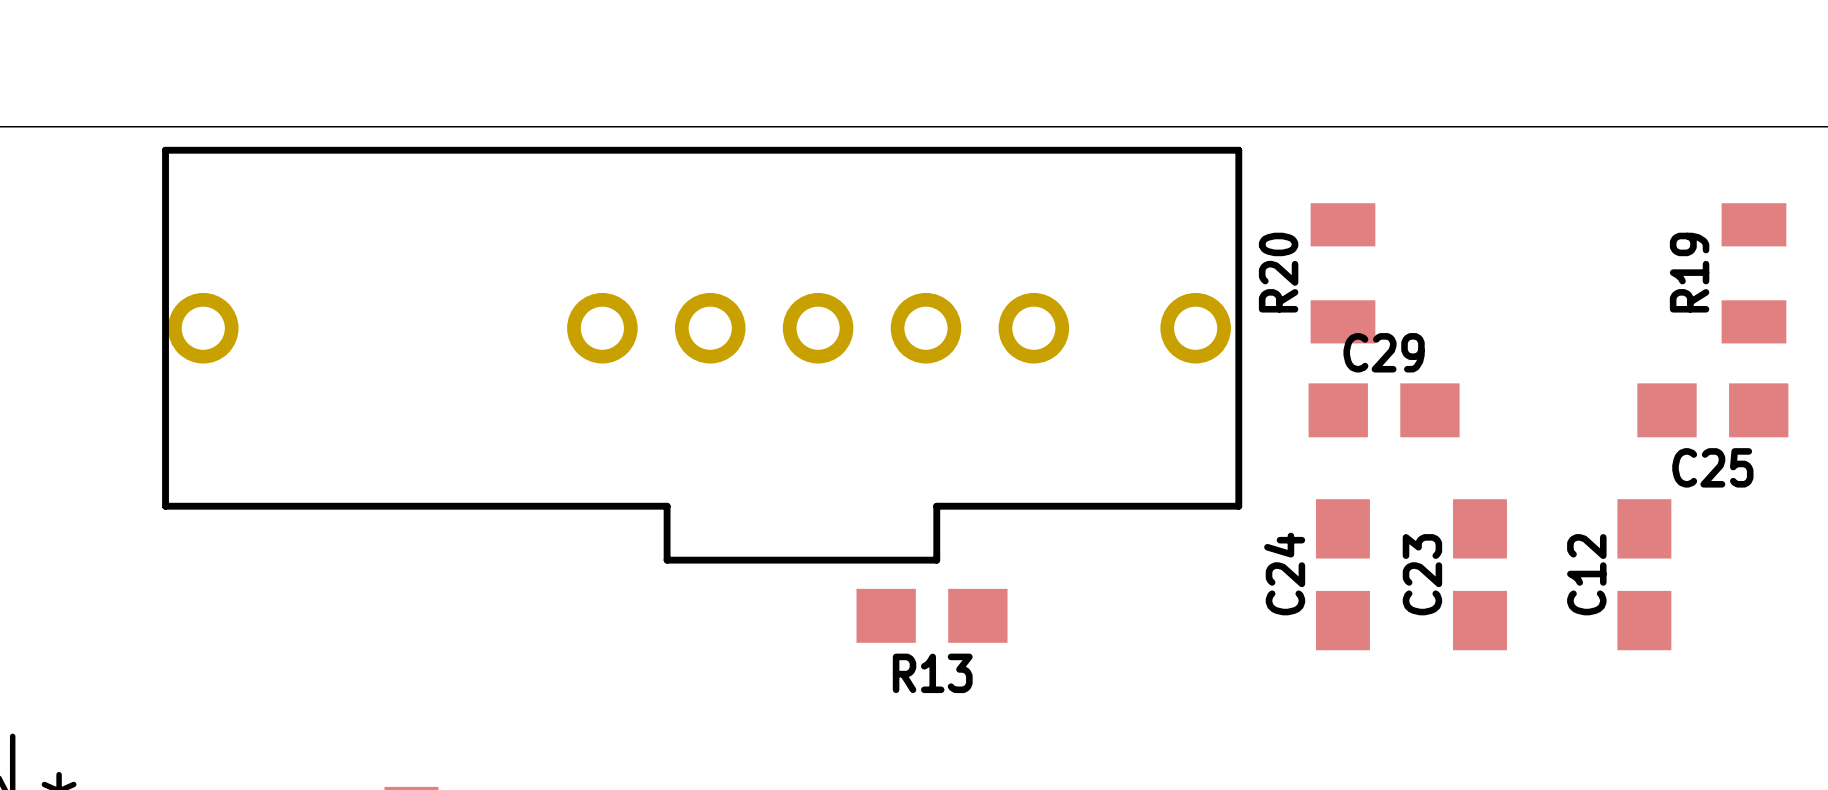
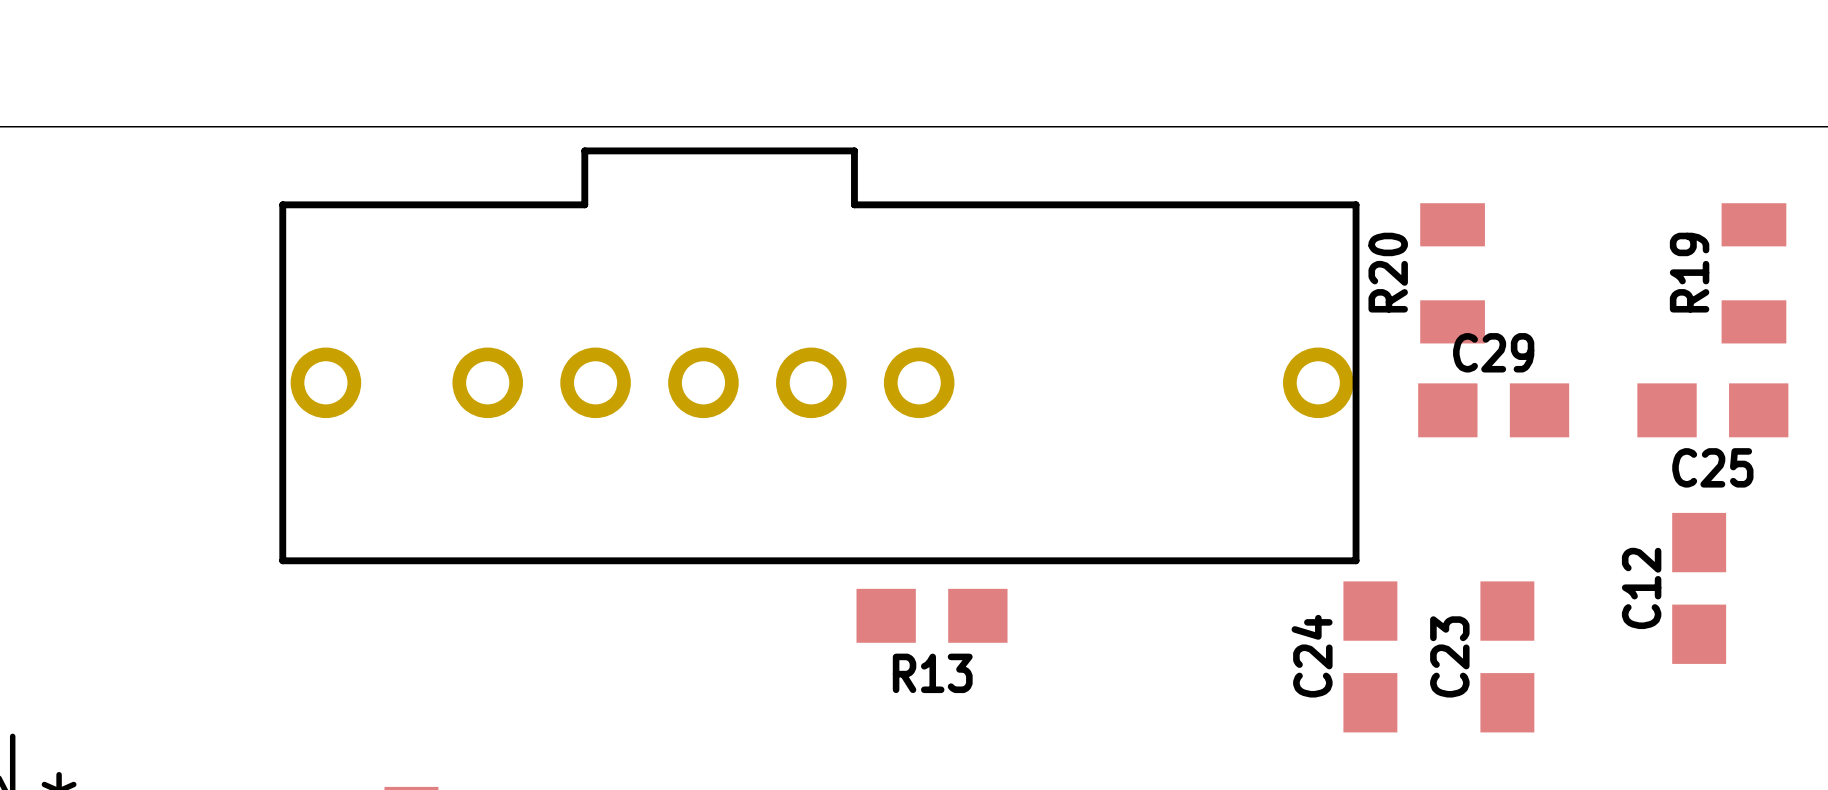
R20 position: (1342, 273) -> (1452, 273)
part rotation: 0° (702, 355) -> 180° (819, 355)
C29 position: (1384, 410) -> (1493, 410)
C24 position: (1342, 574) -> (1370, 656)
C23 position: (1479, 574) -> (1507, 656)
C12 position: (1644, 574) -> (1699, 588)

